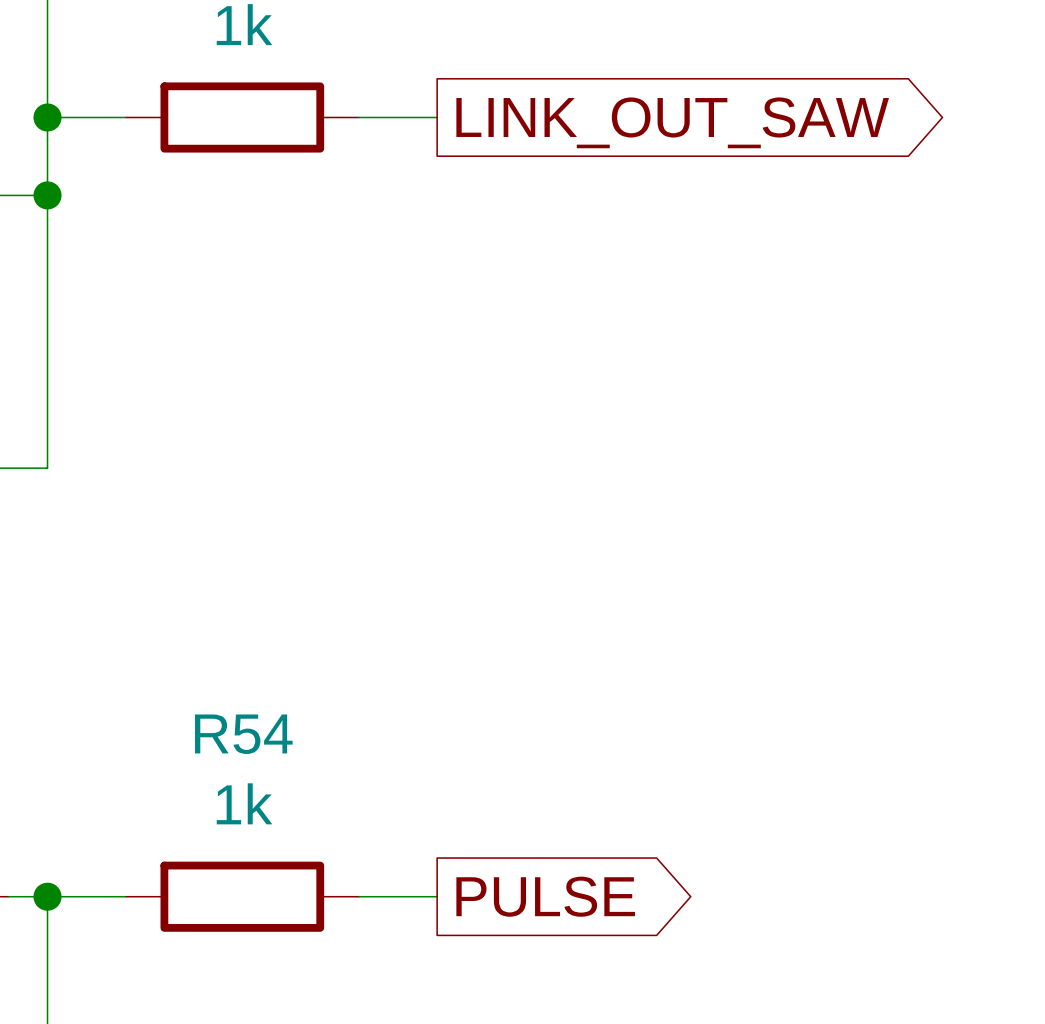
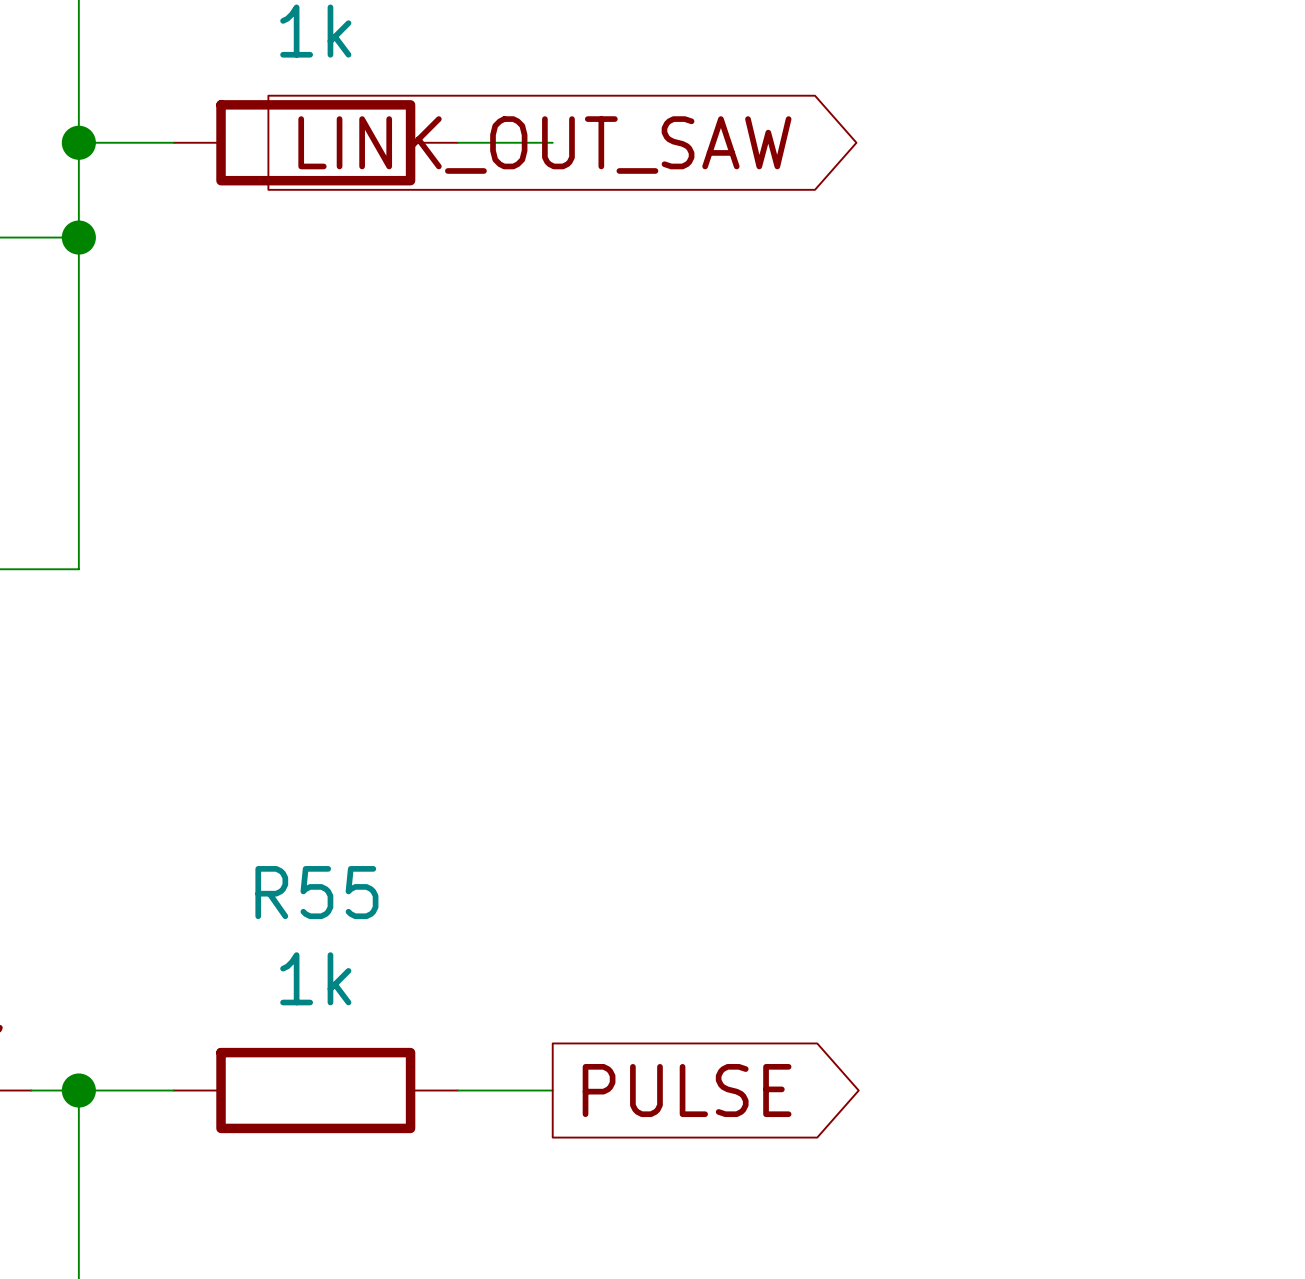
global label position: LINK_OUT_SAW (672, 122) -> LINK_OUT_SAW (544, 145)
R54 name: R54 (243, 734) -> R55 (316, 892)

